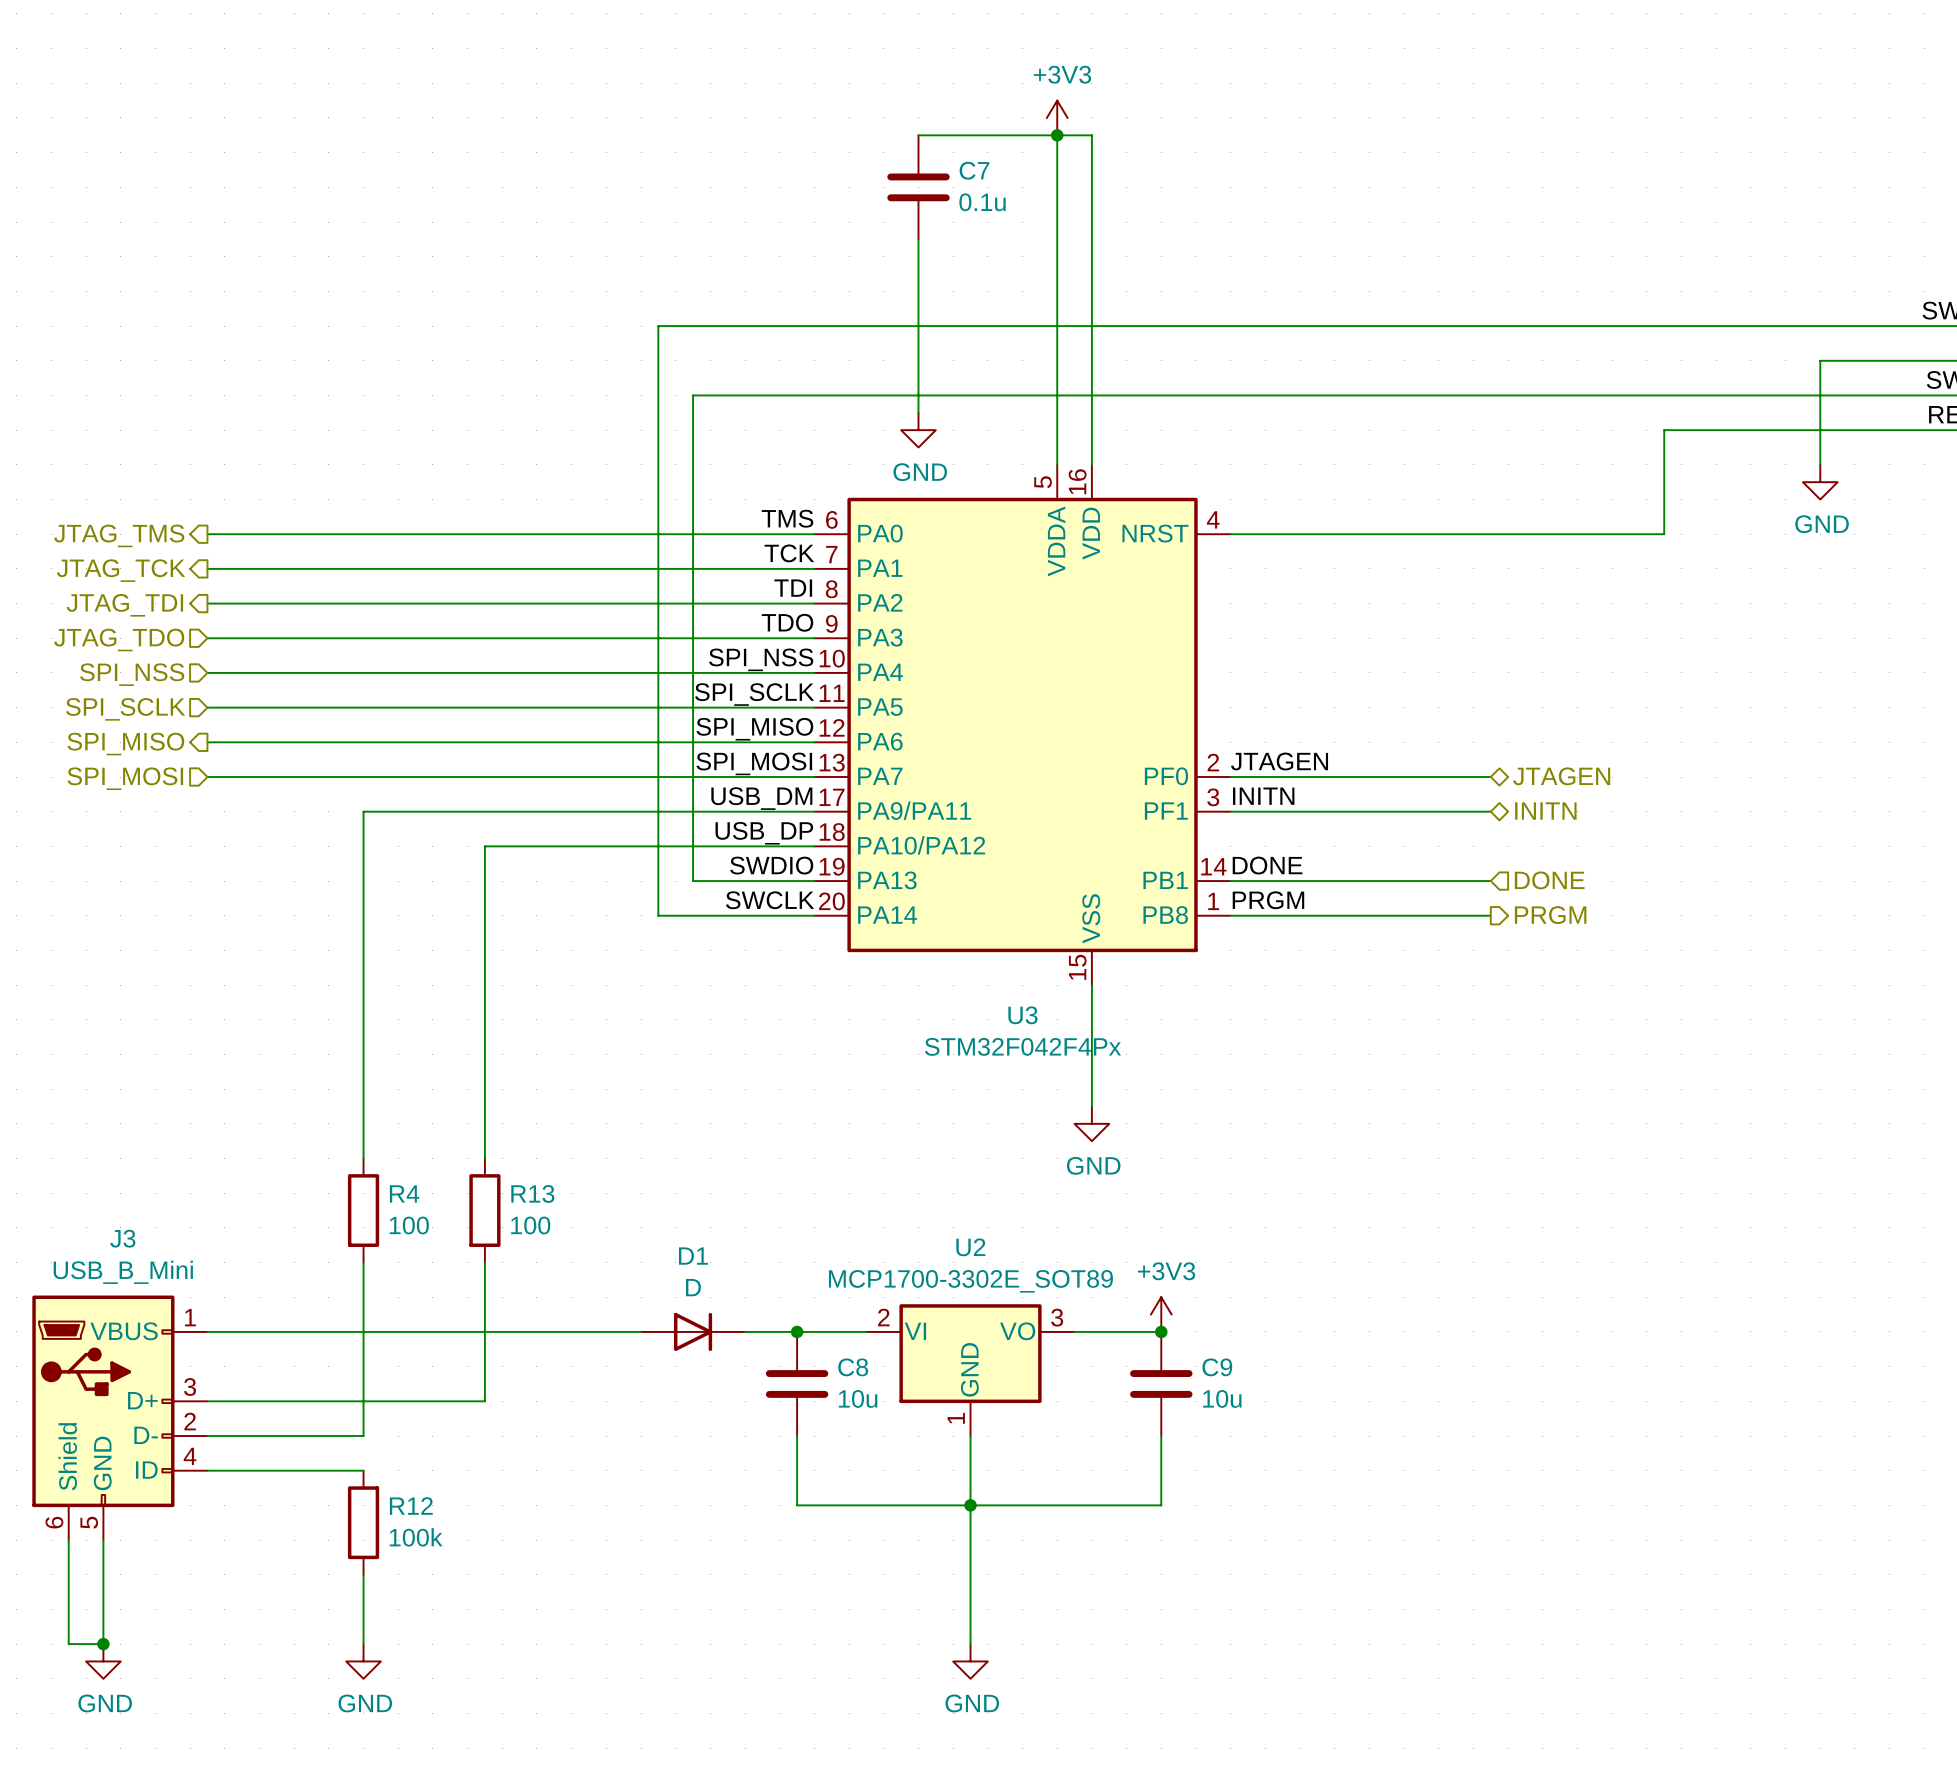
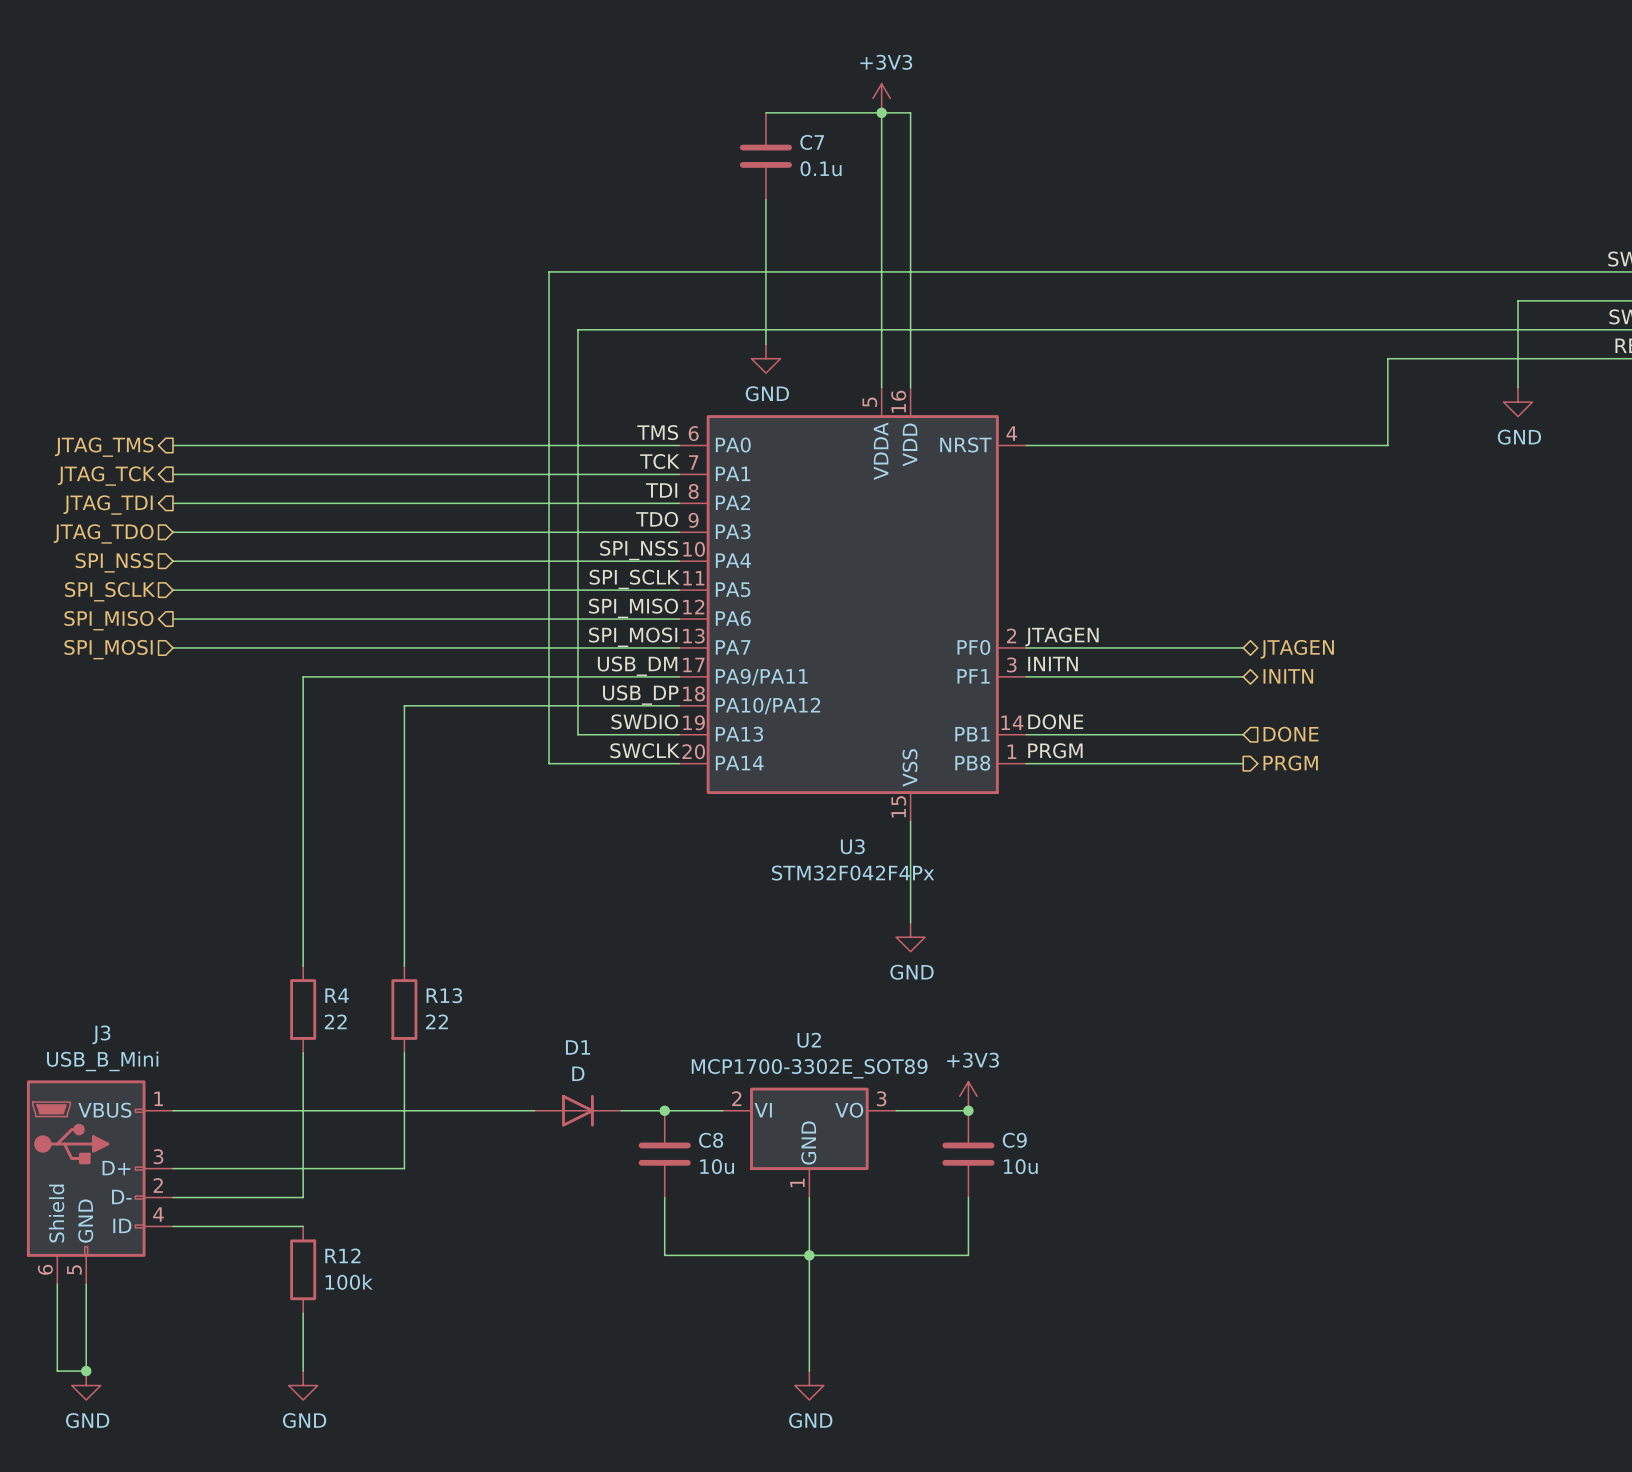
R4 value: 100 (409, 1225) -> 22 (335, 1021)
R13 value: 100 (530, 1225) -> 22 (437, 1021)

